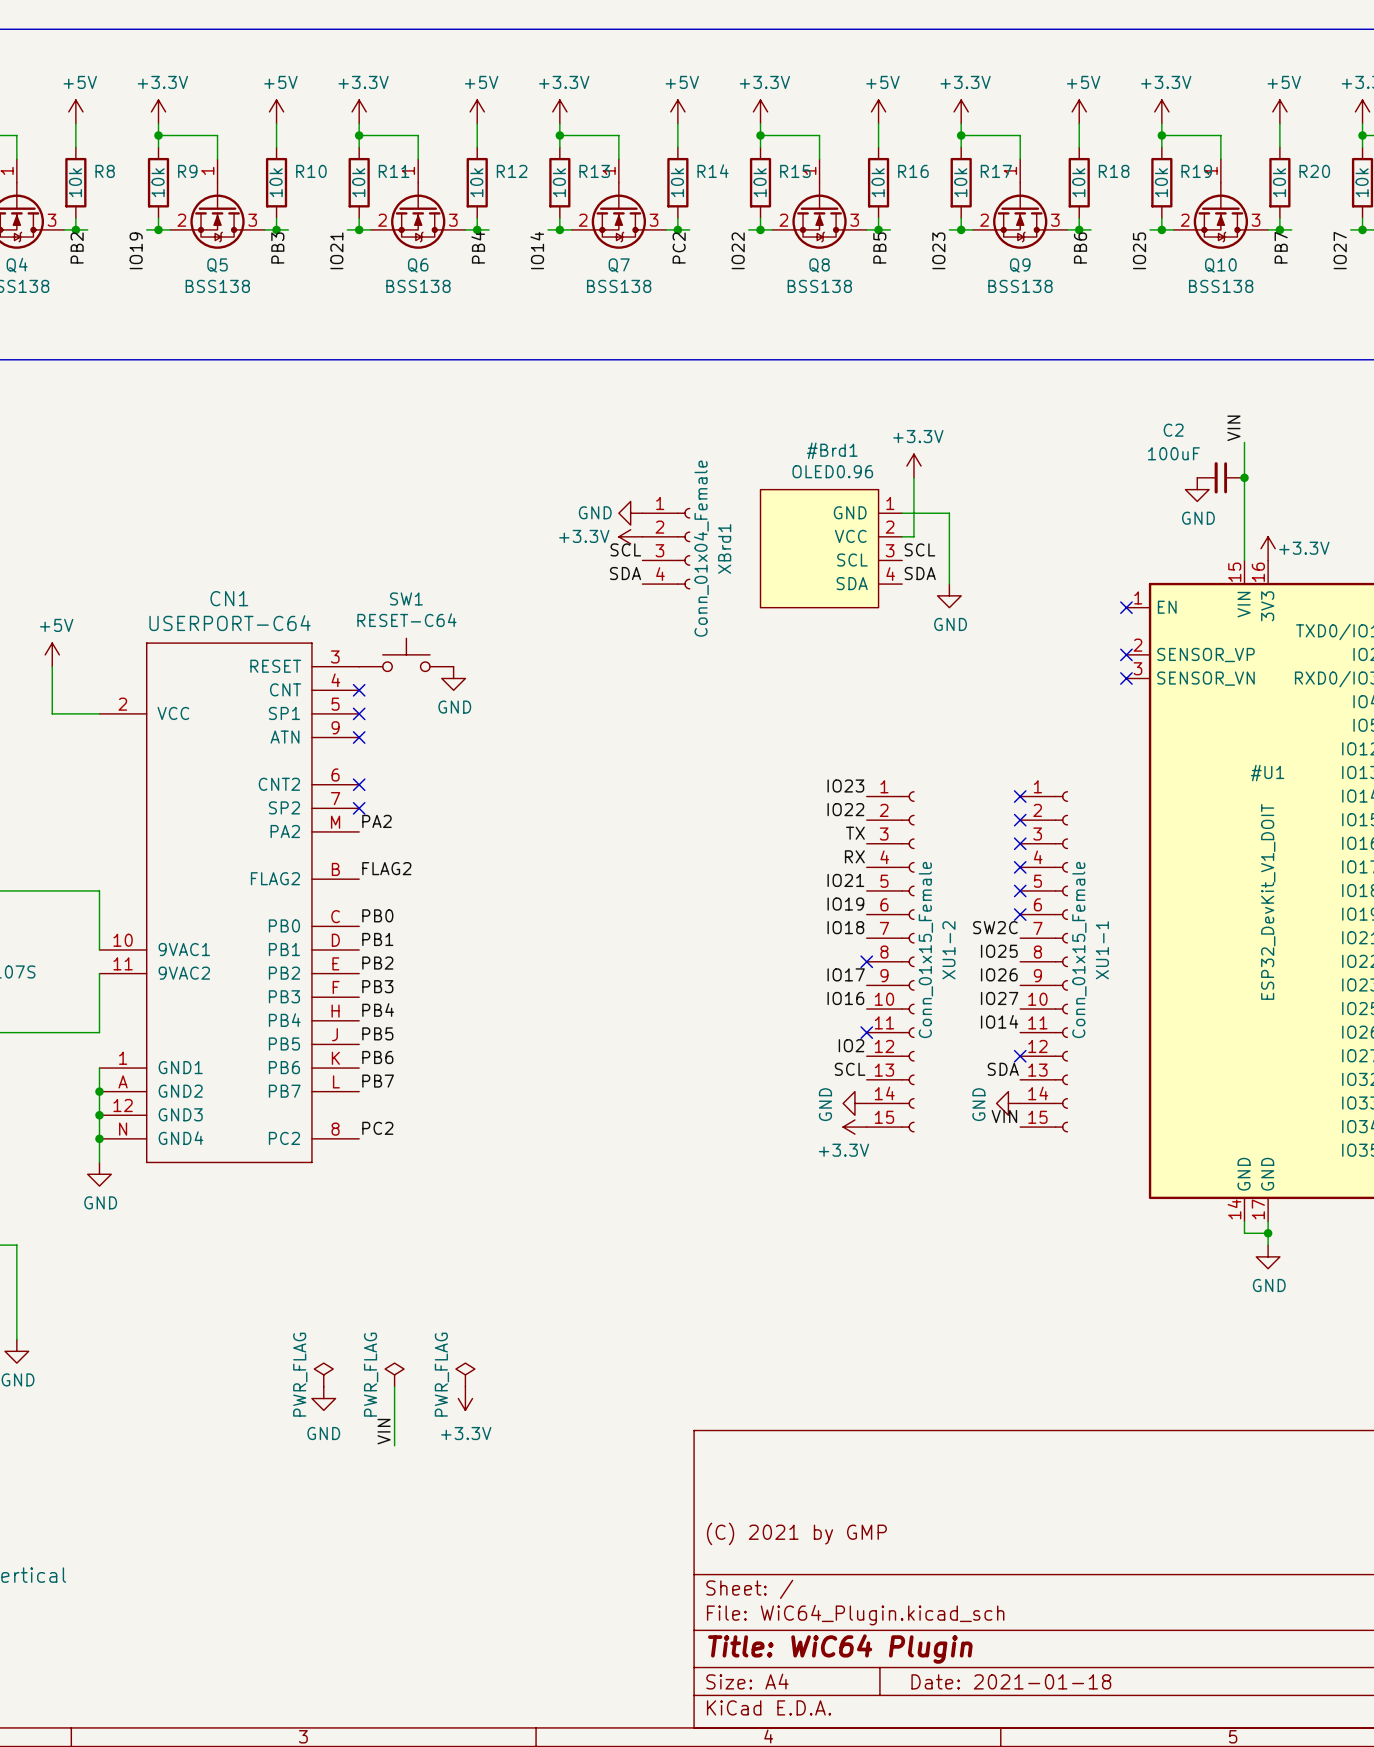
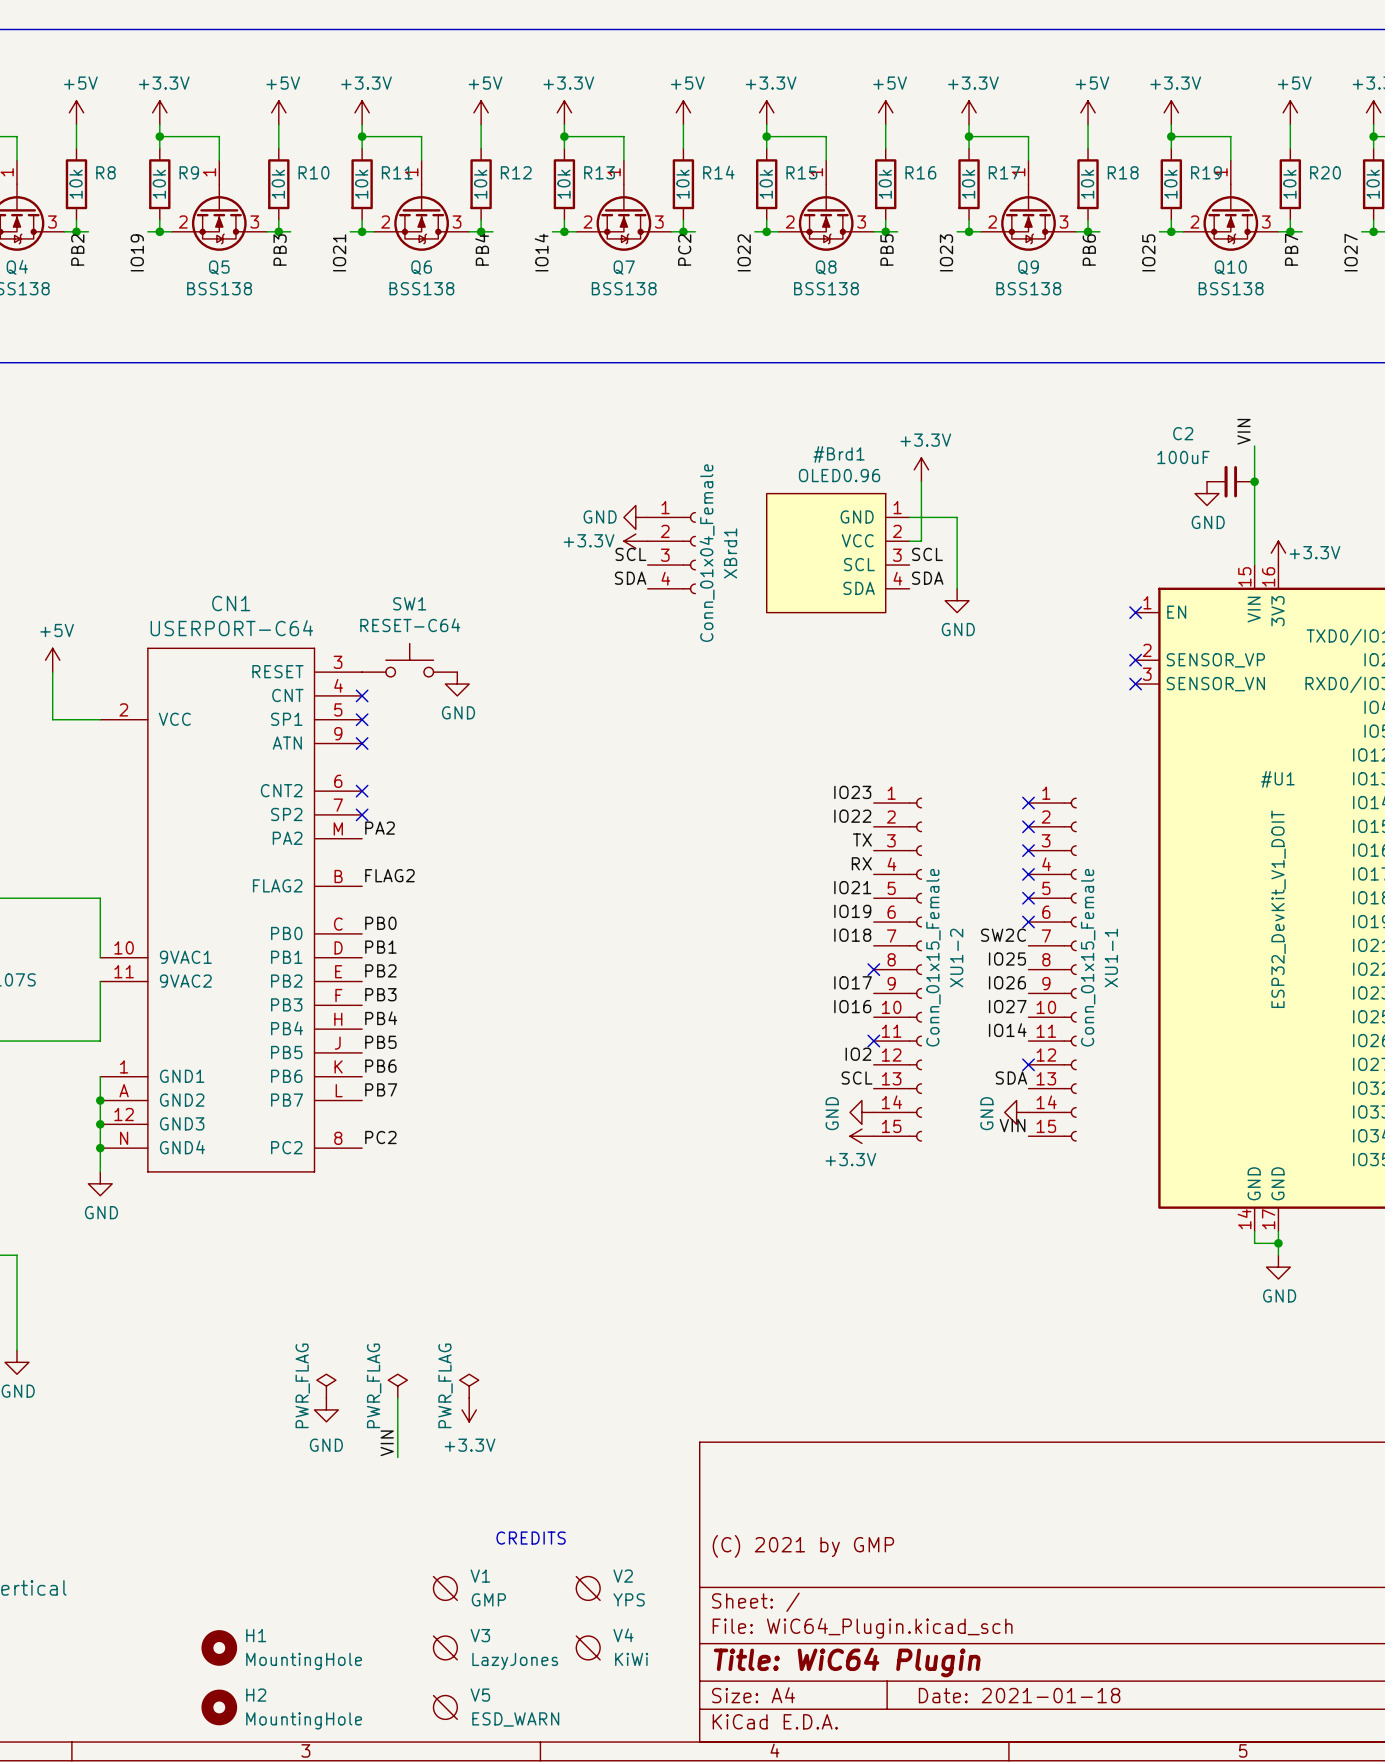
text: none -> CREDITS (531, 1538)
V1: none -> GMP (445, 1588)
V2: none -> YPS (588, 1588)
H1: none -> MountingHole (219, 1647)
V3: none -> LazyJones (445, 1647)
V4: none -> KiWi (588, 1647)
H2: none -> MountingHole (219, 1707)
V5: none -> ESD_WARN (445, 1707)

